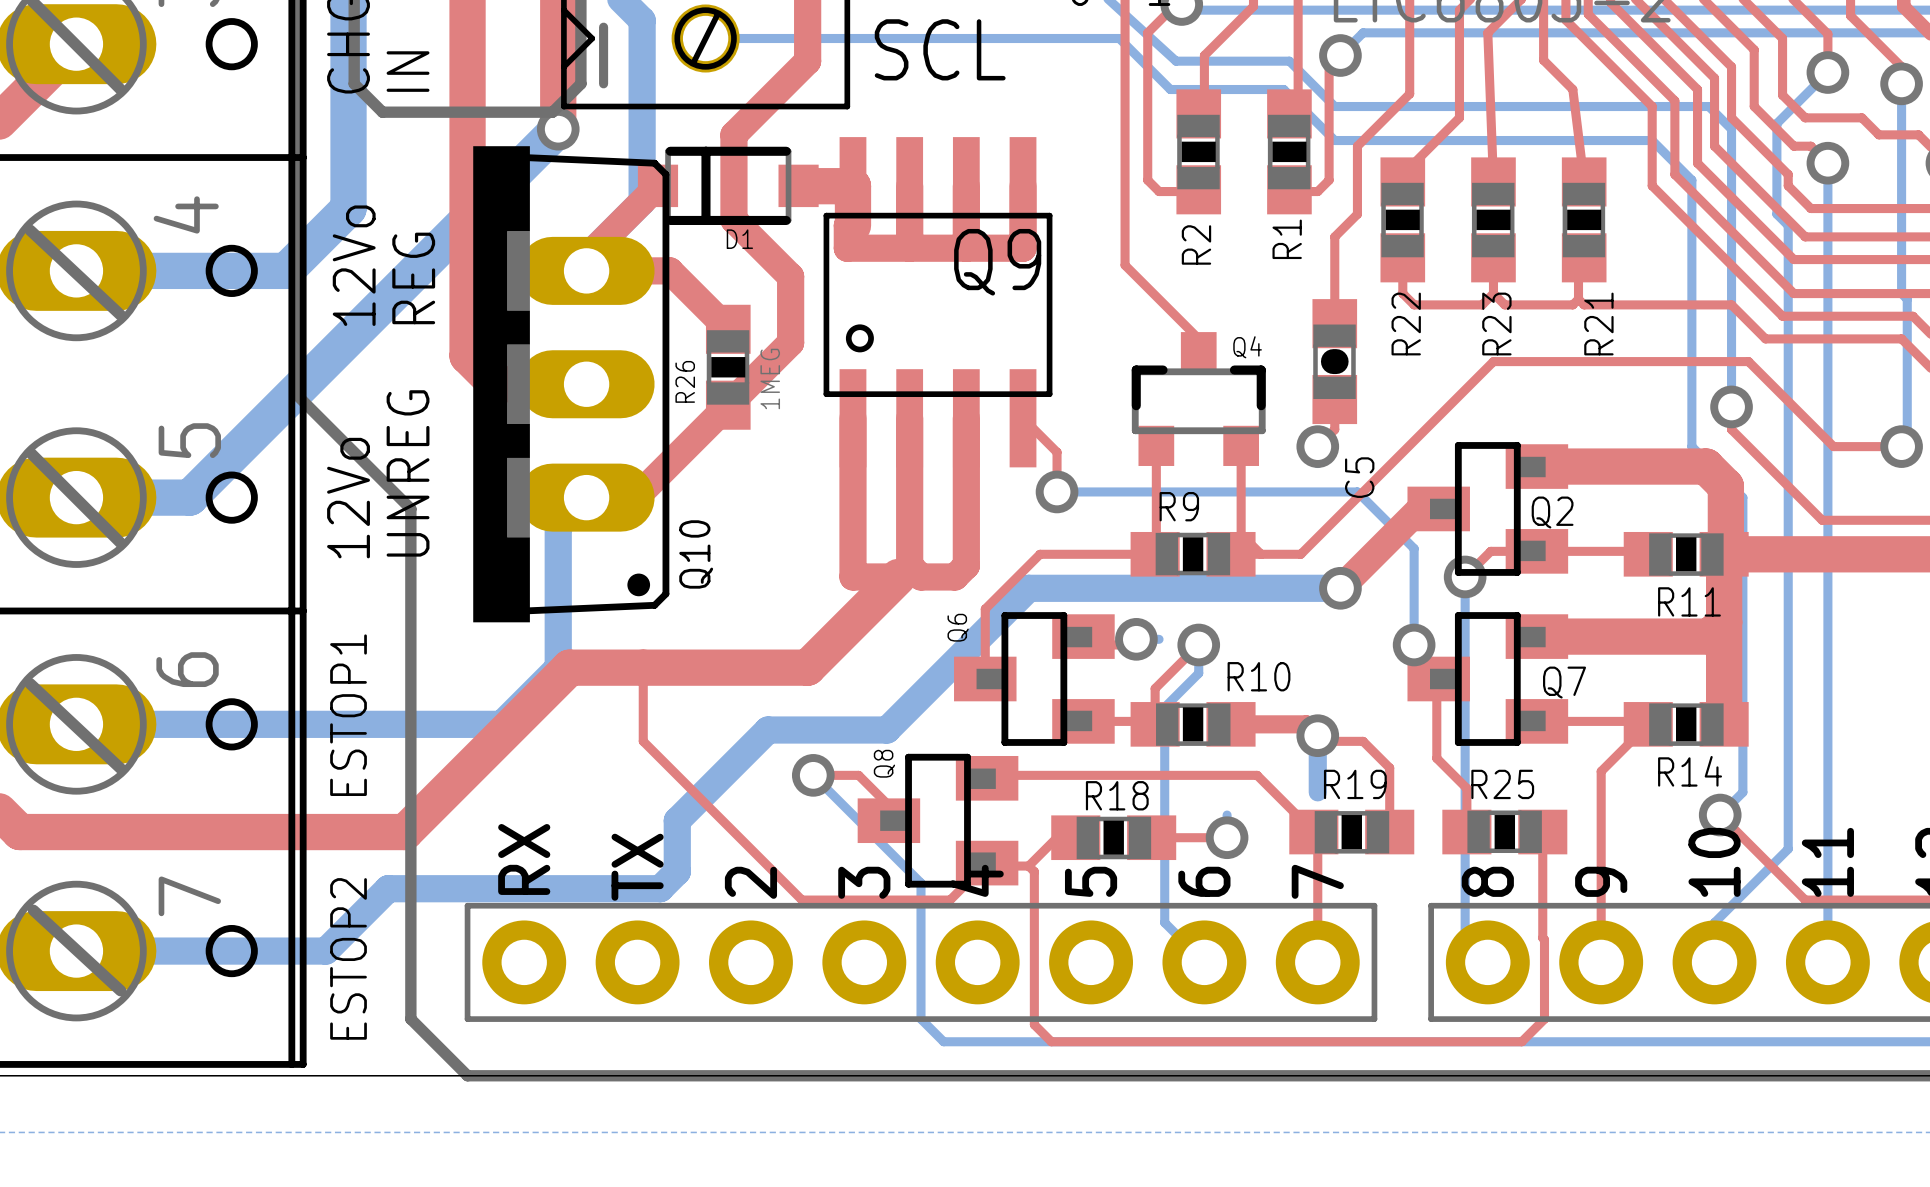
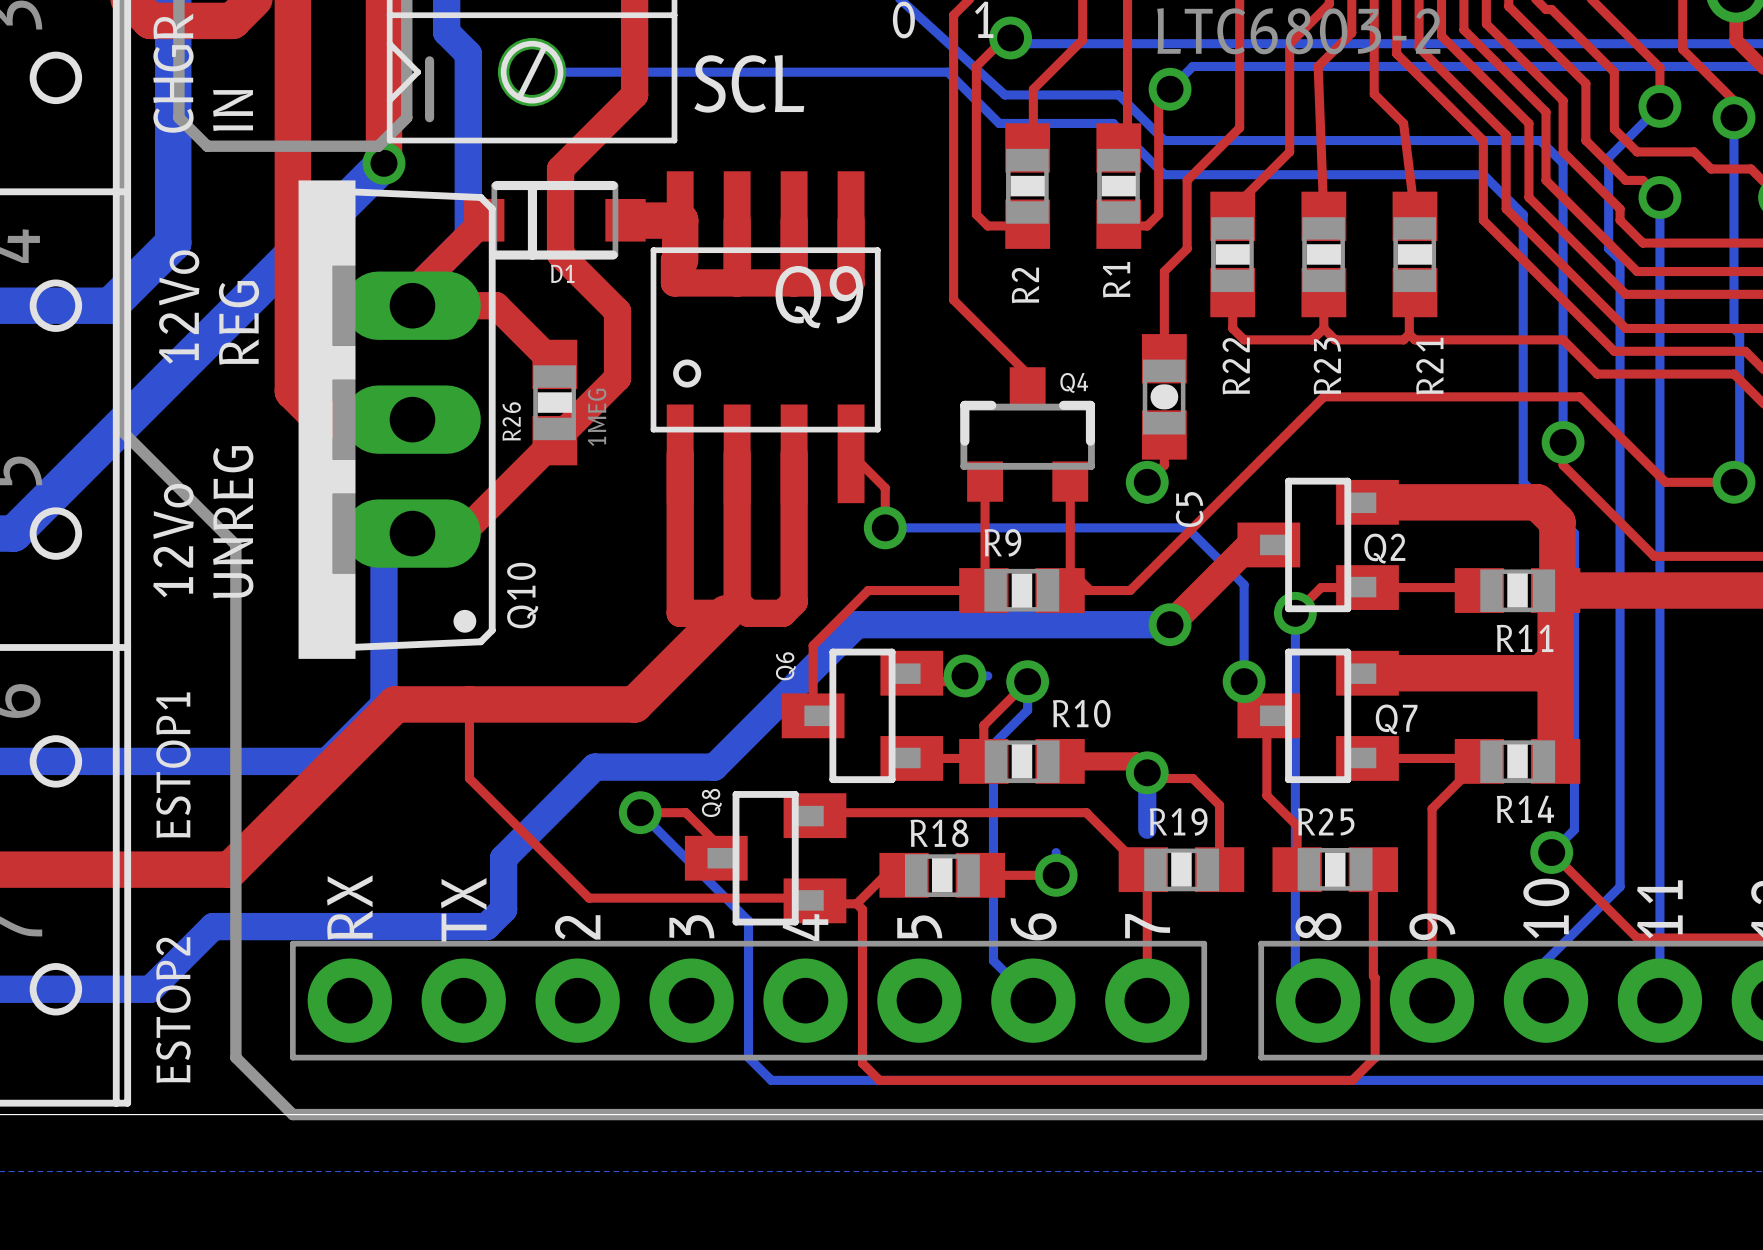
top track: (762, 860) (801, 900) (950, 900) (987, 863) -> (589, 898) (812, 898)

